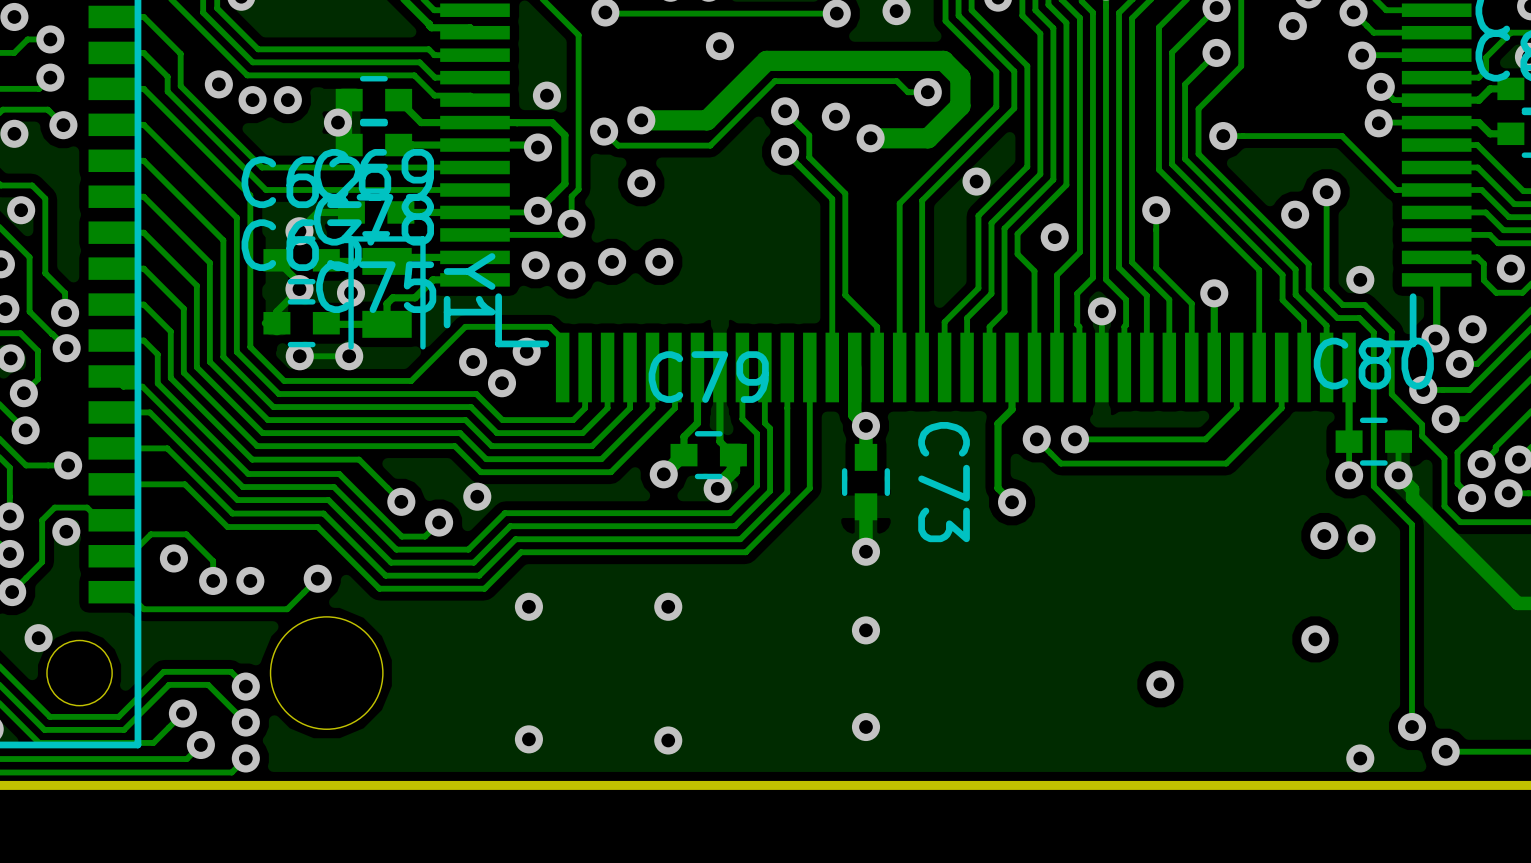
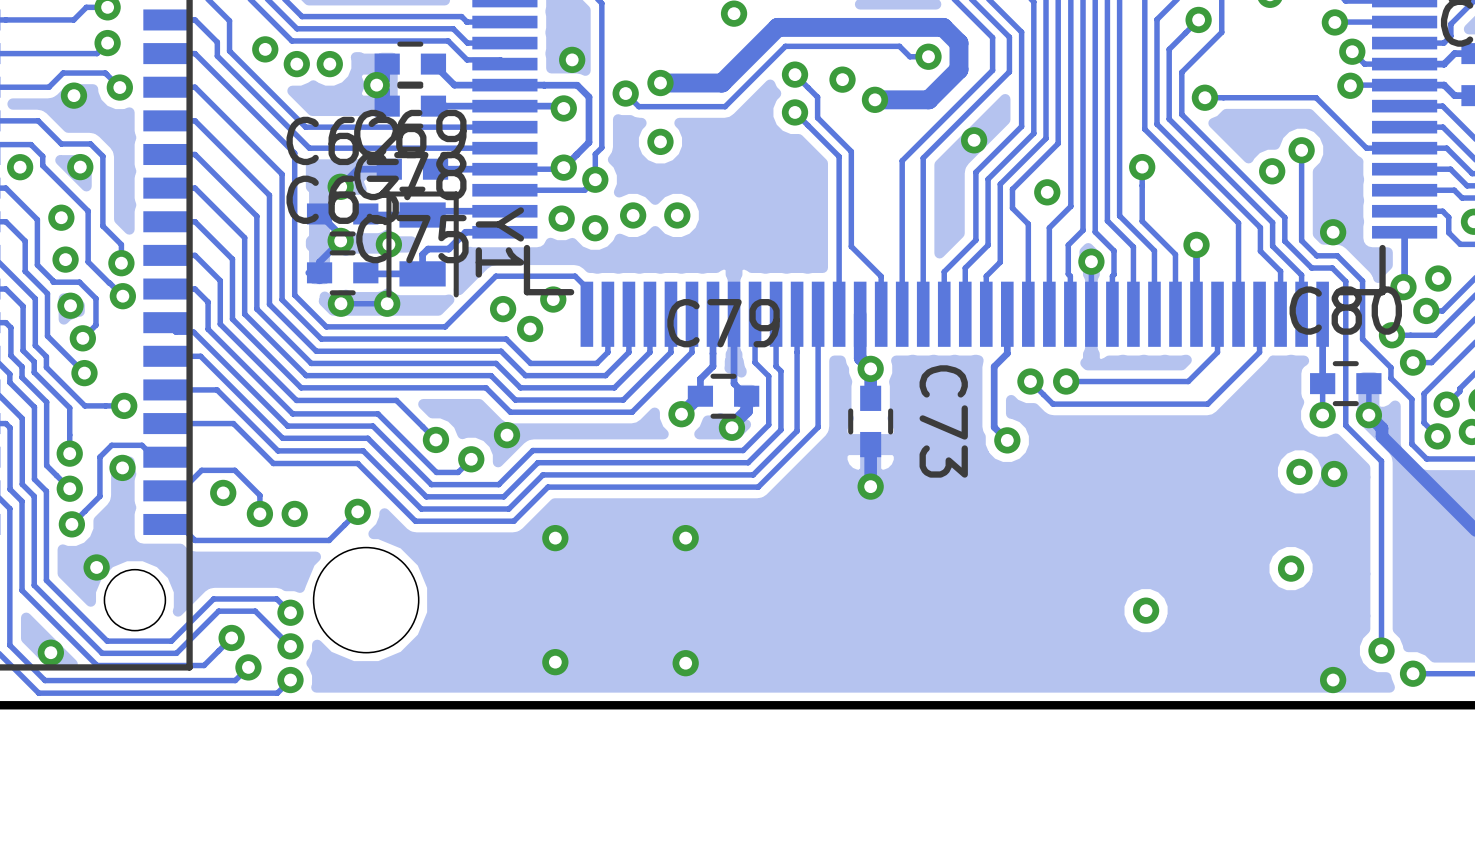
via: (865, 630) -> none
via: (866, 727) -> none

